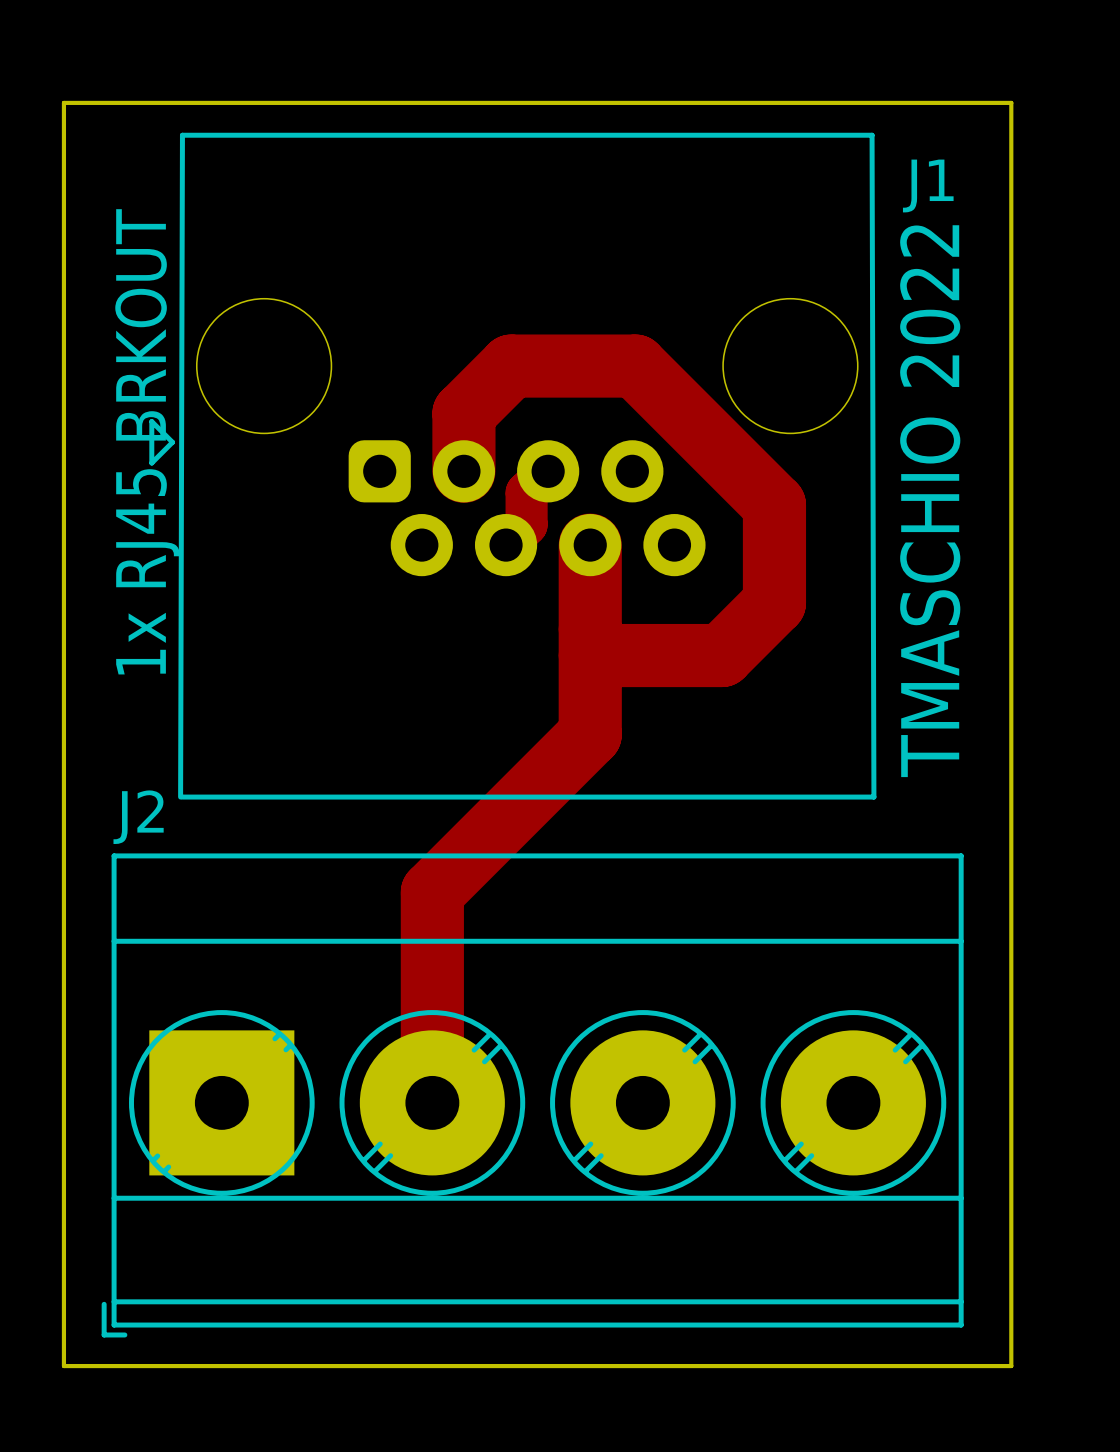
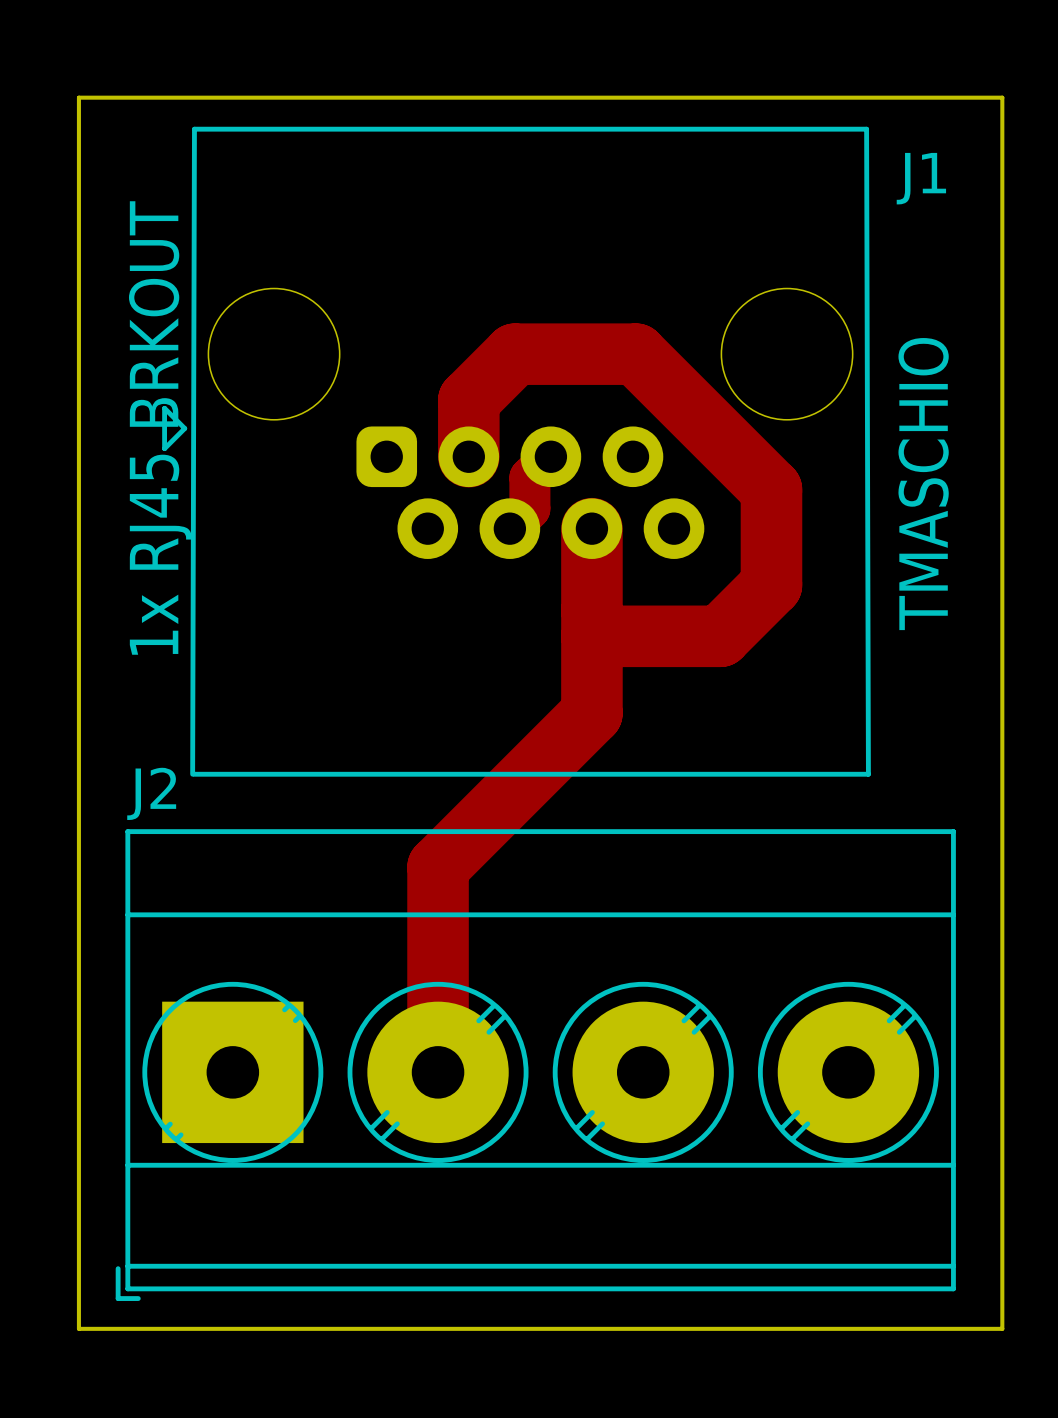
text: TMASCHIO 2022 (930, 501) -> TMASCHIO (923, 484)

